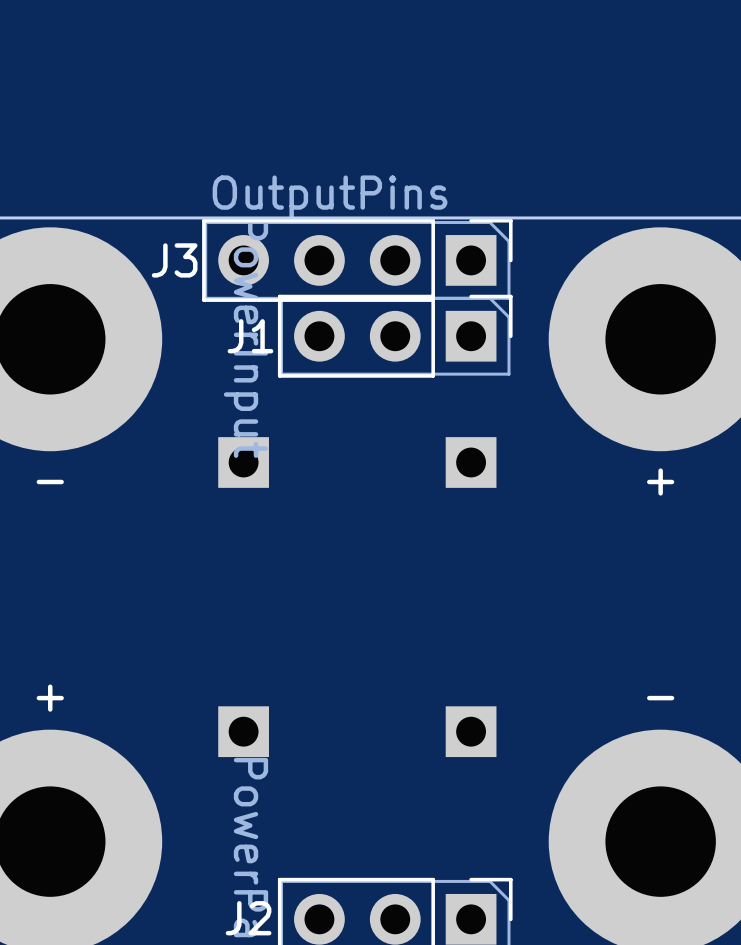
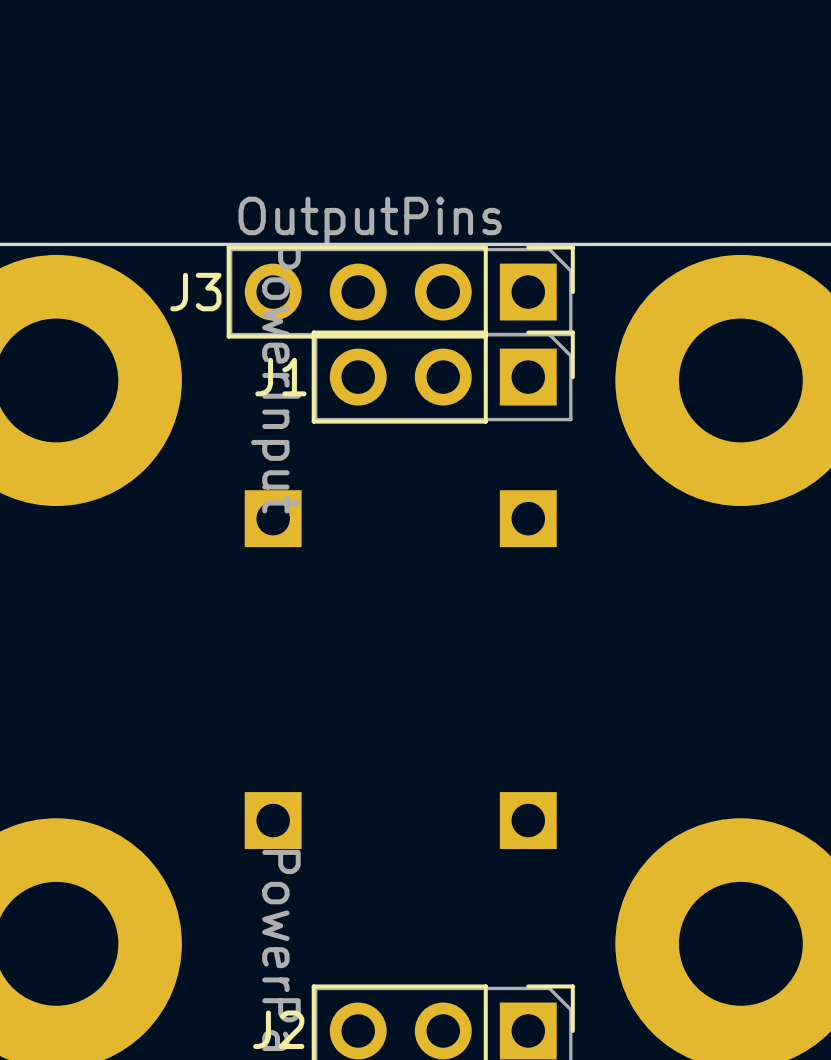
text: - (50, 481) -> none
text: + (660, 481) -> none
text: + (50, 698) -> none
text: - (660, 698) -> none

